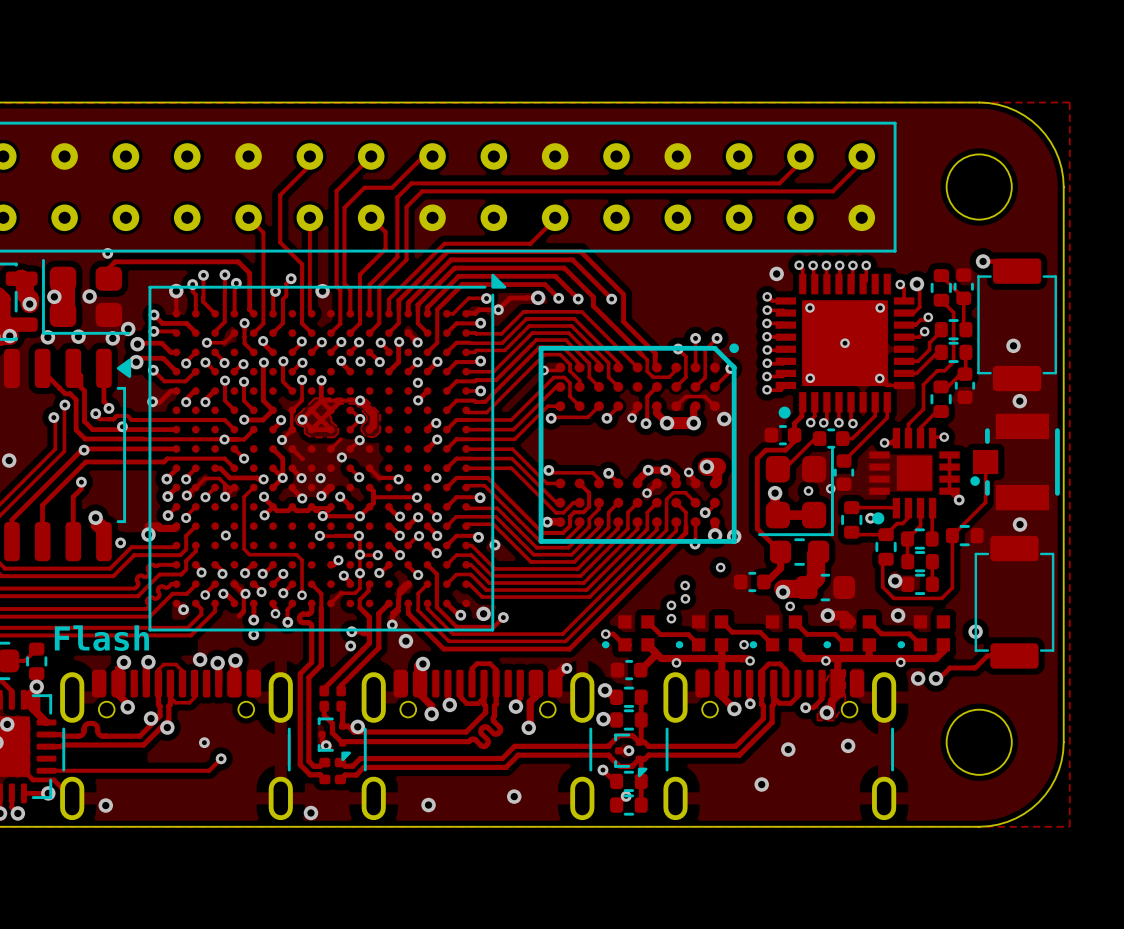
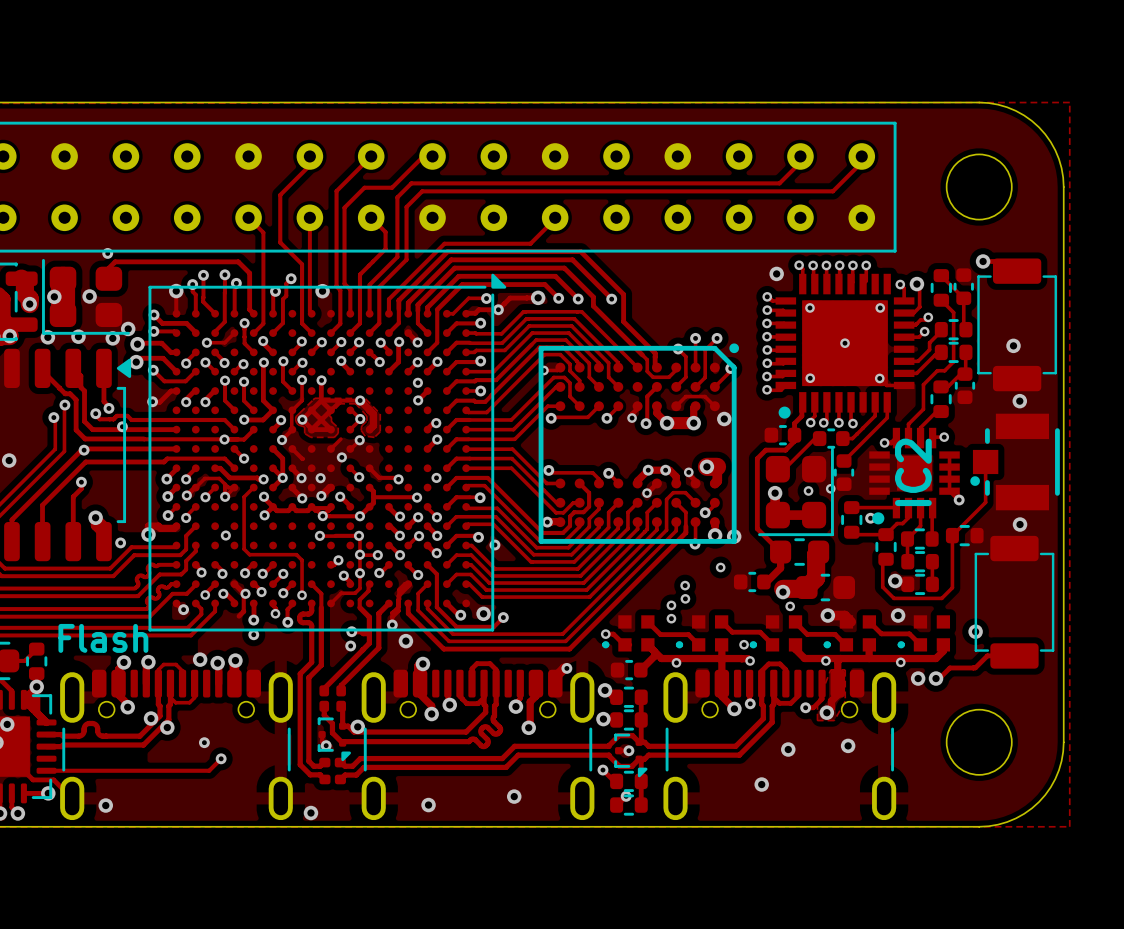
IC2 name: none -> IC2 (913, 472)

